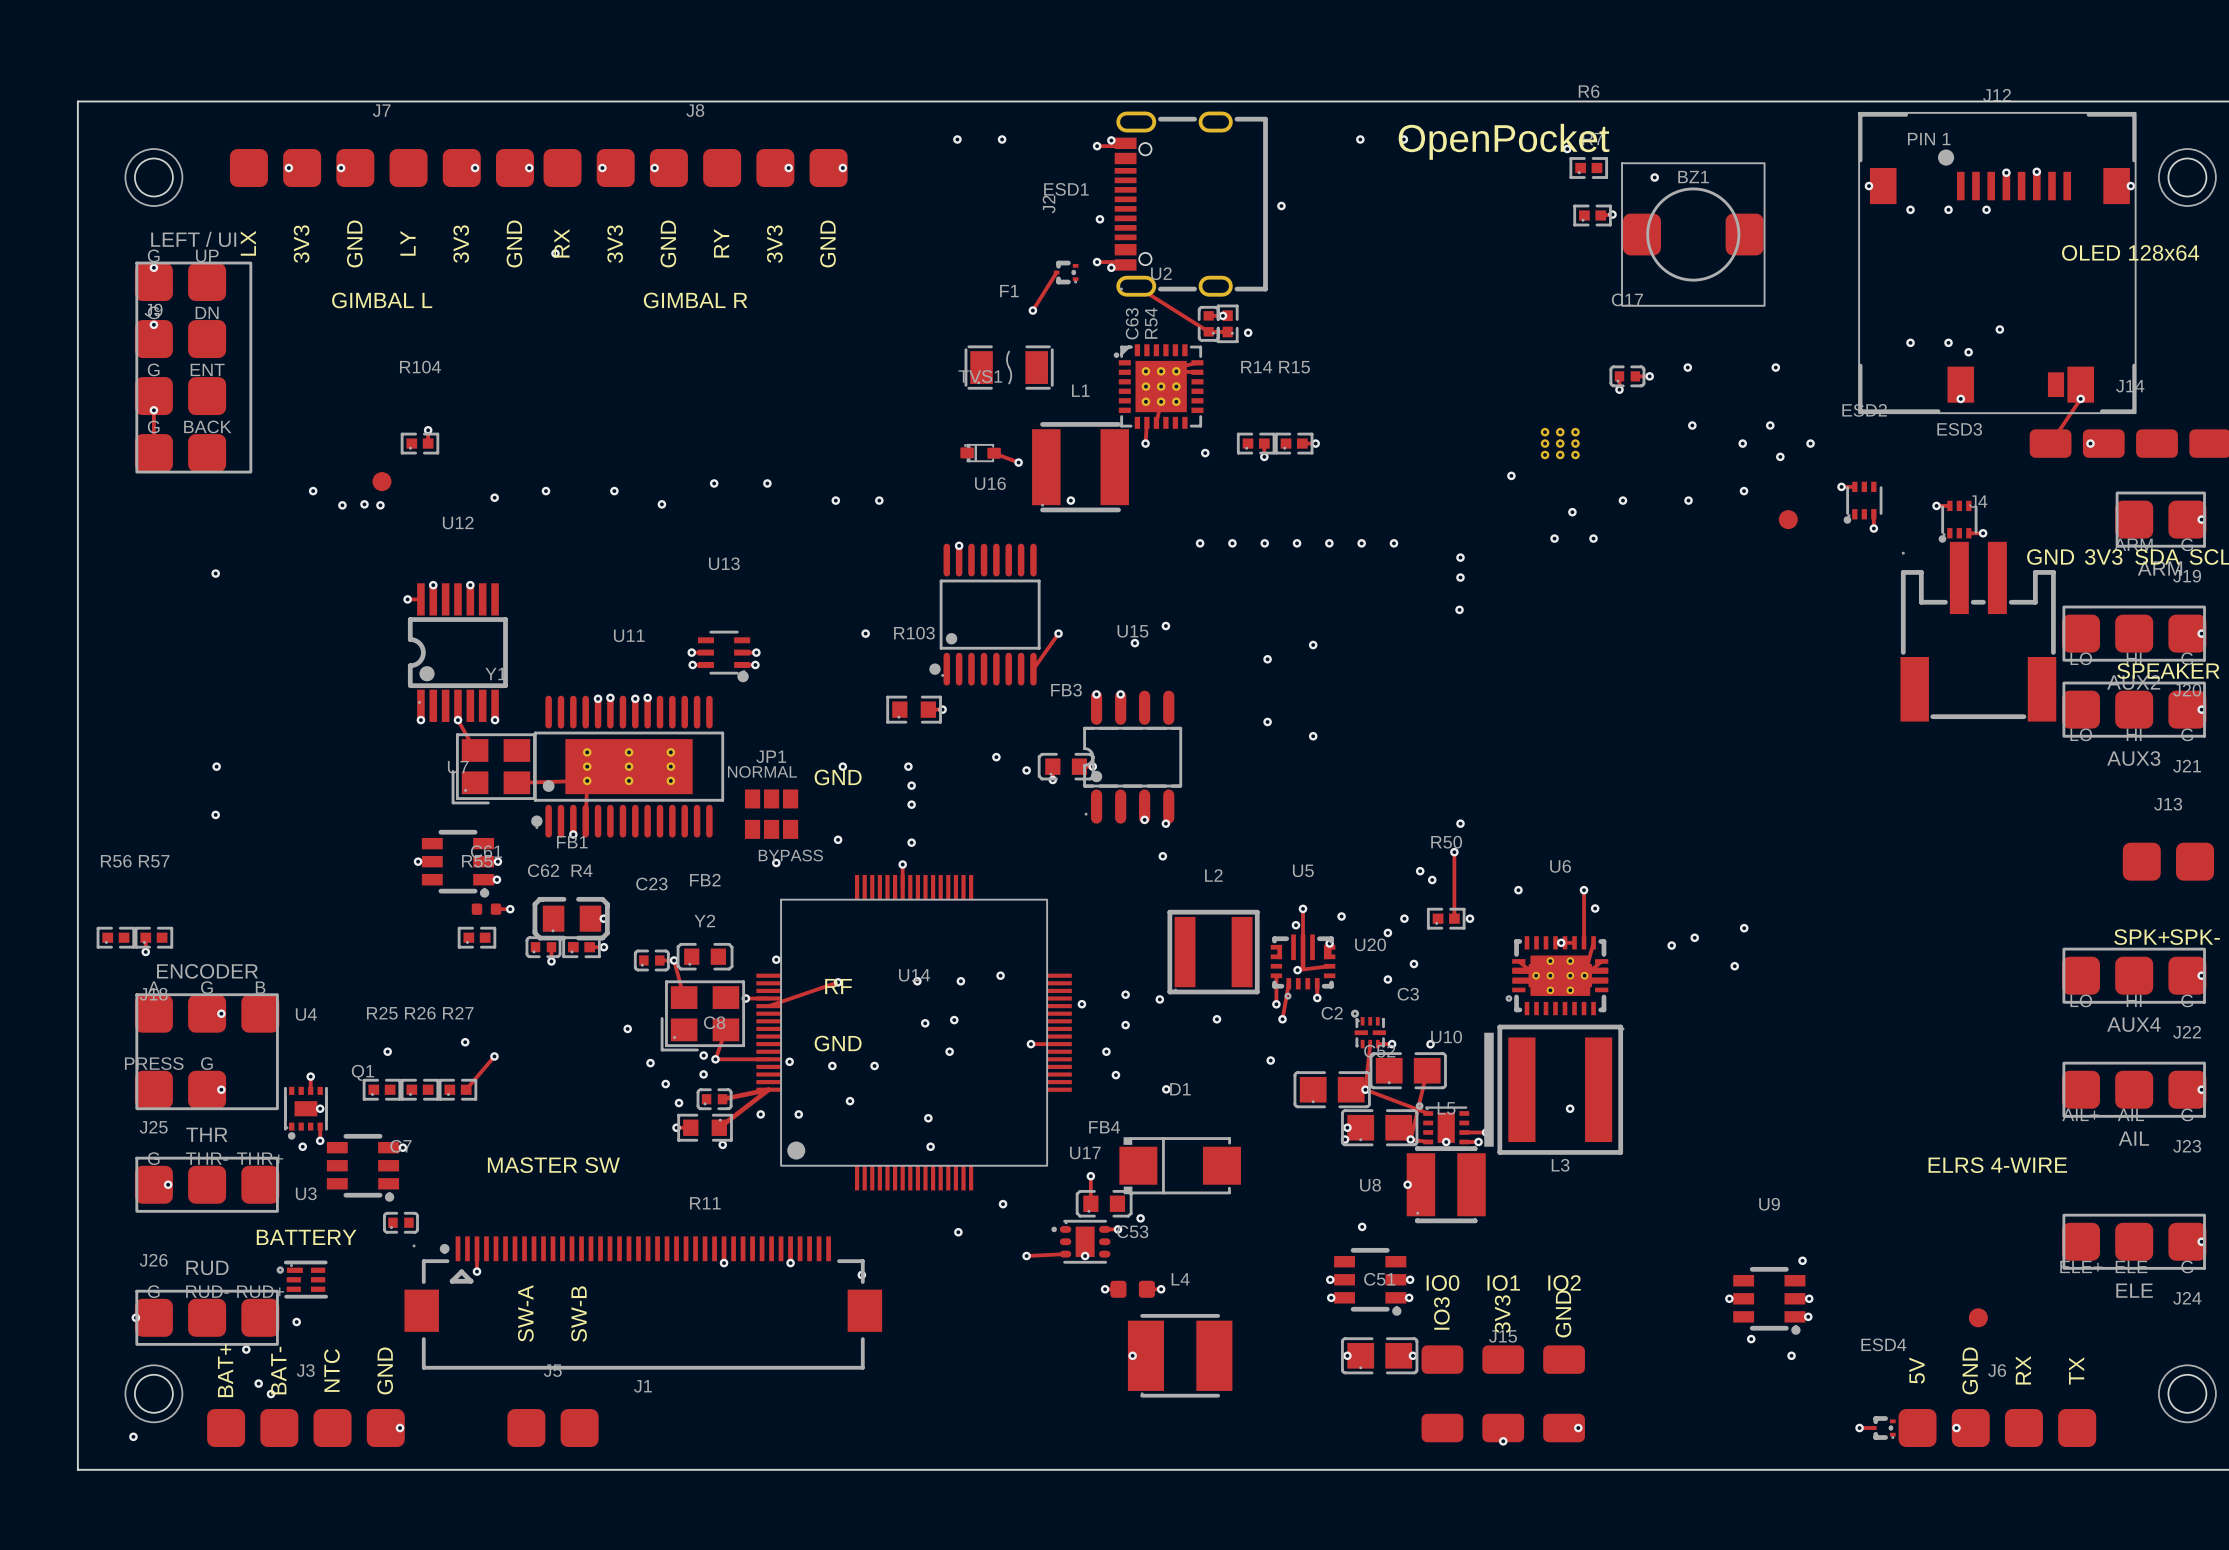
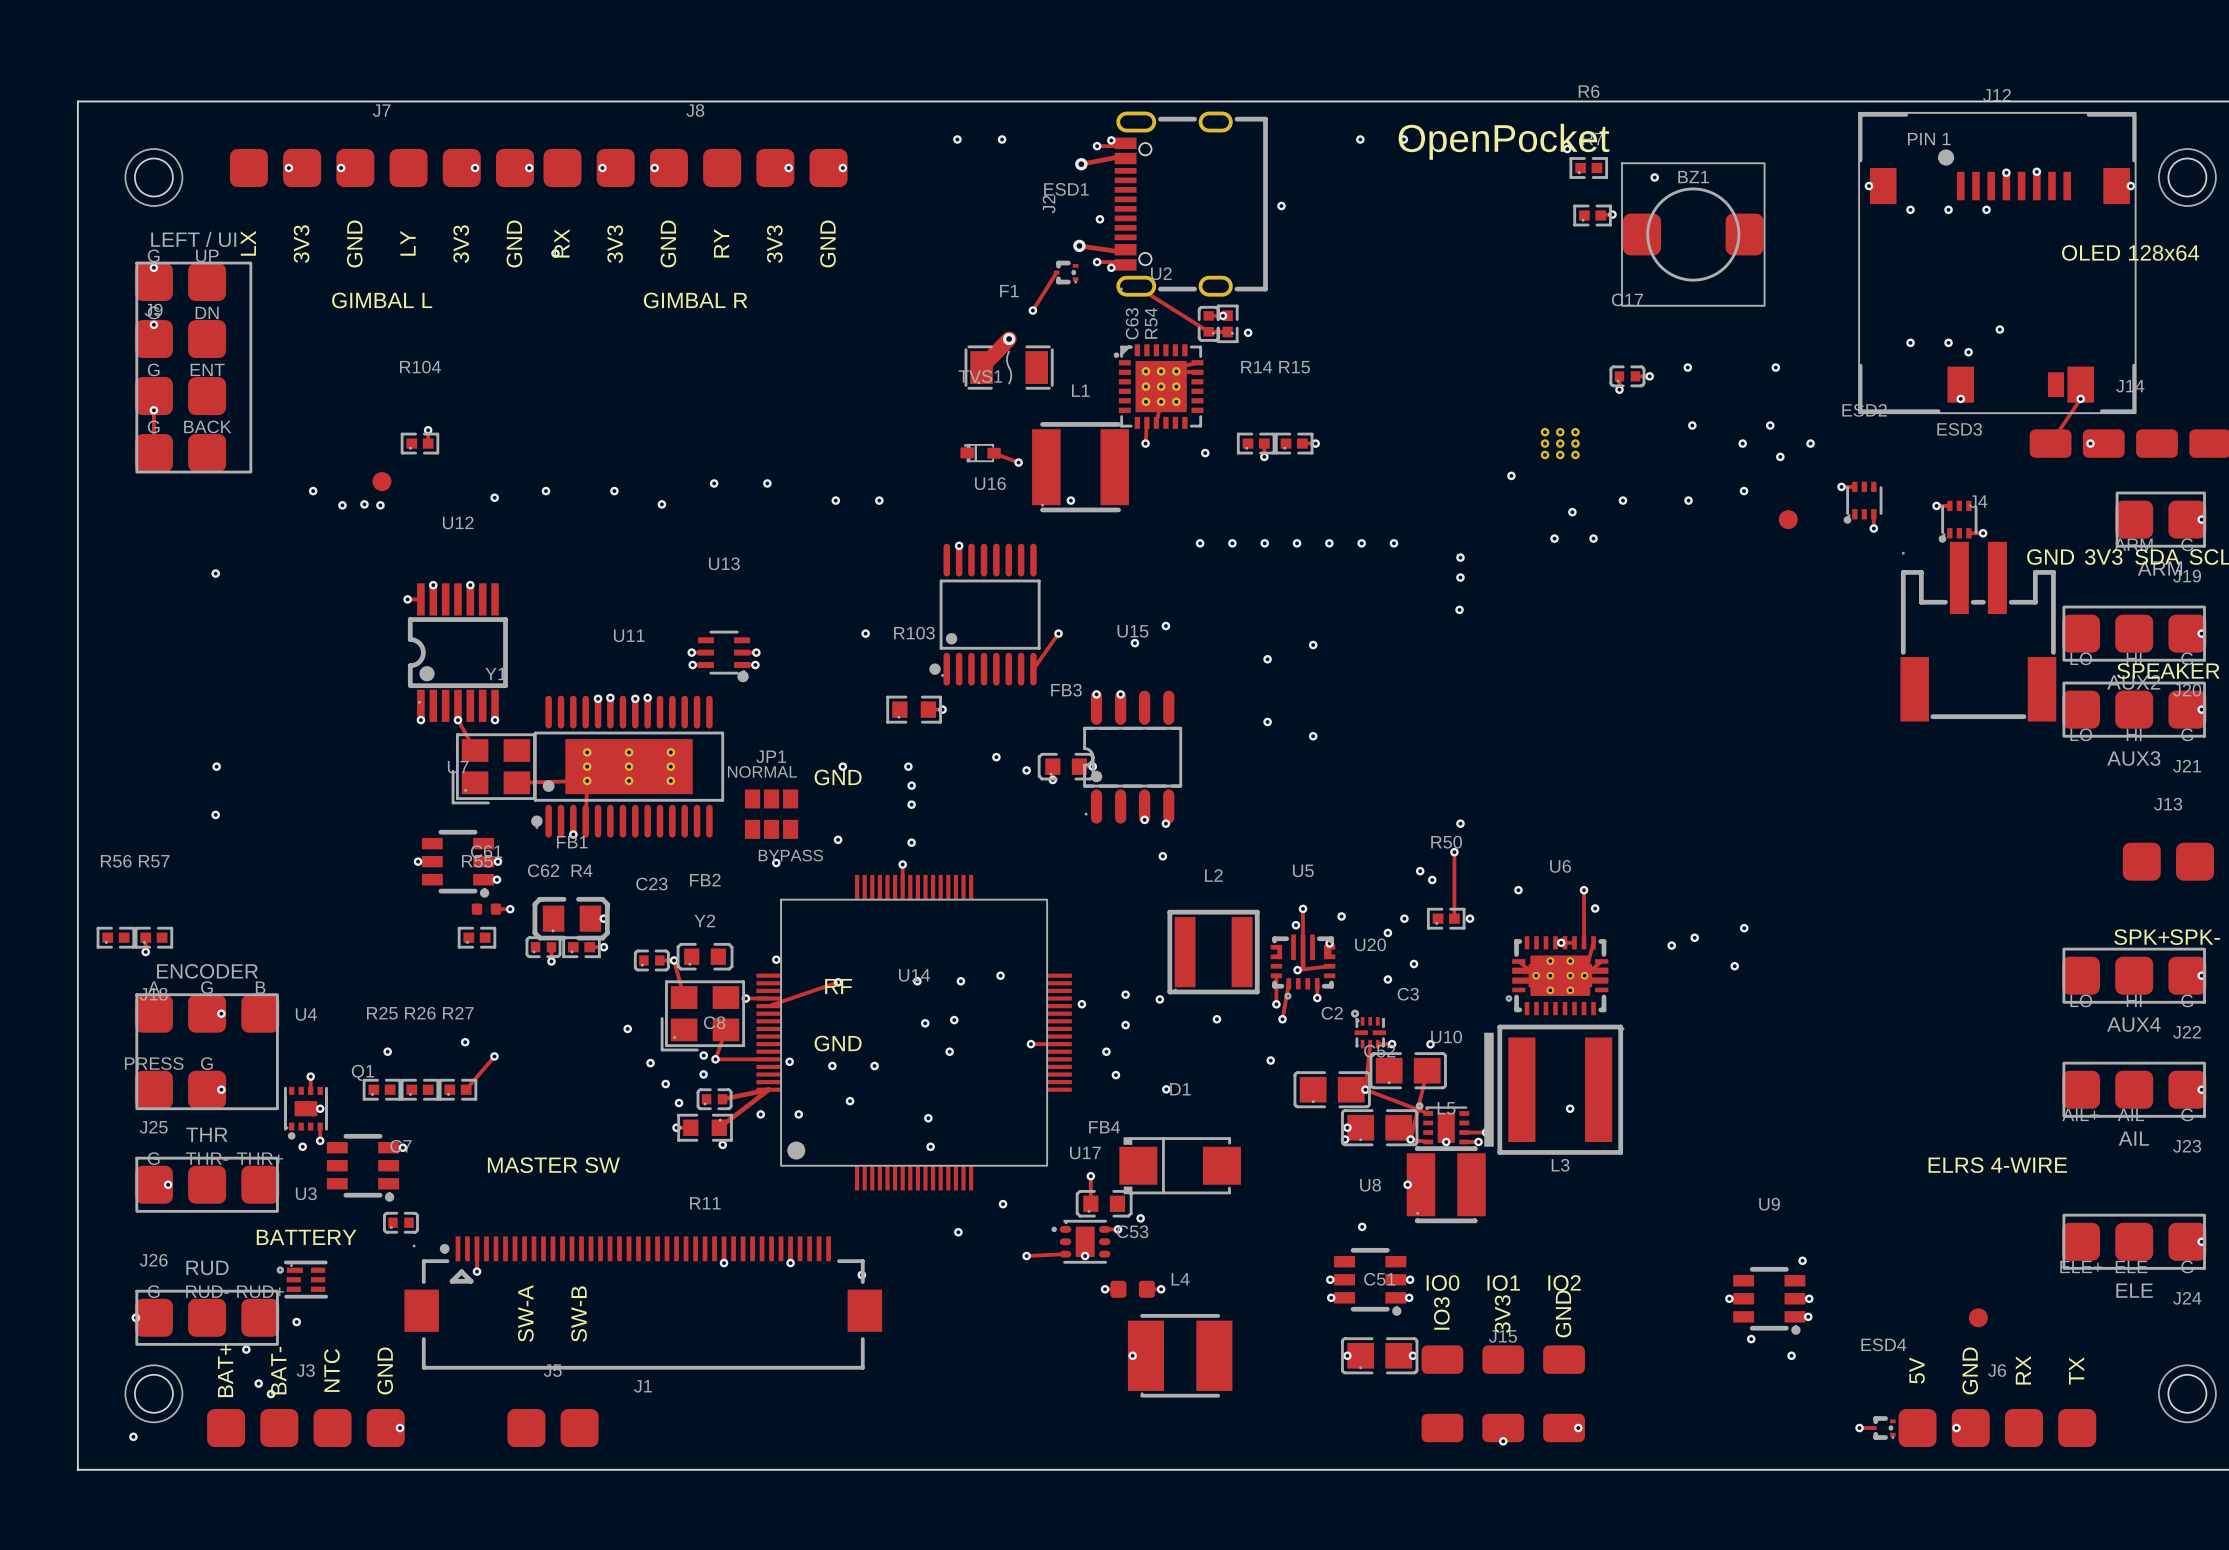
track: none -> (1125, 155) (1081, 164)
via: none -> (1081, 164)
track: none -> (1079, 245) (1125, 252)
via: none -> (1079, 245)
track: none -> (1009, 339) (981, 367)
via: none -> (1009, 339)

